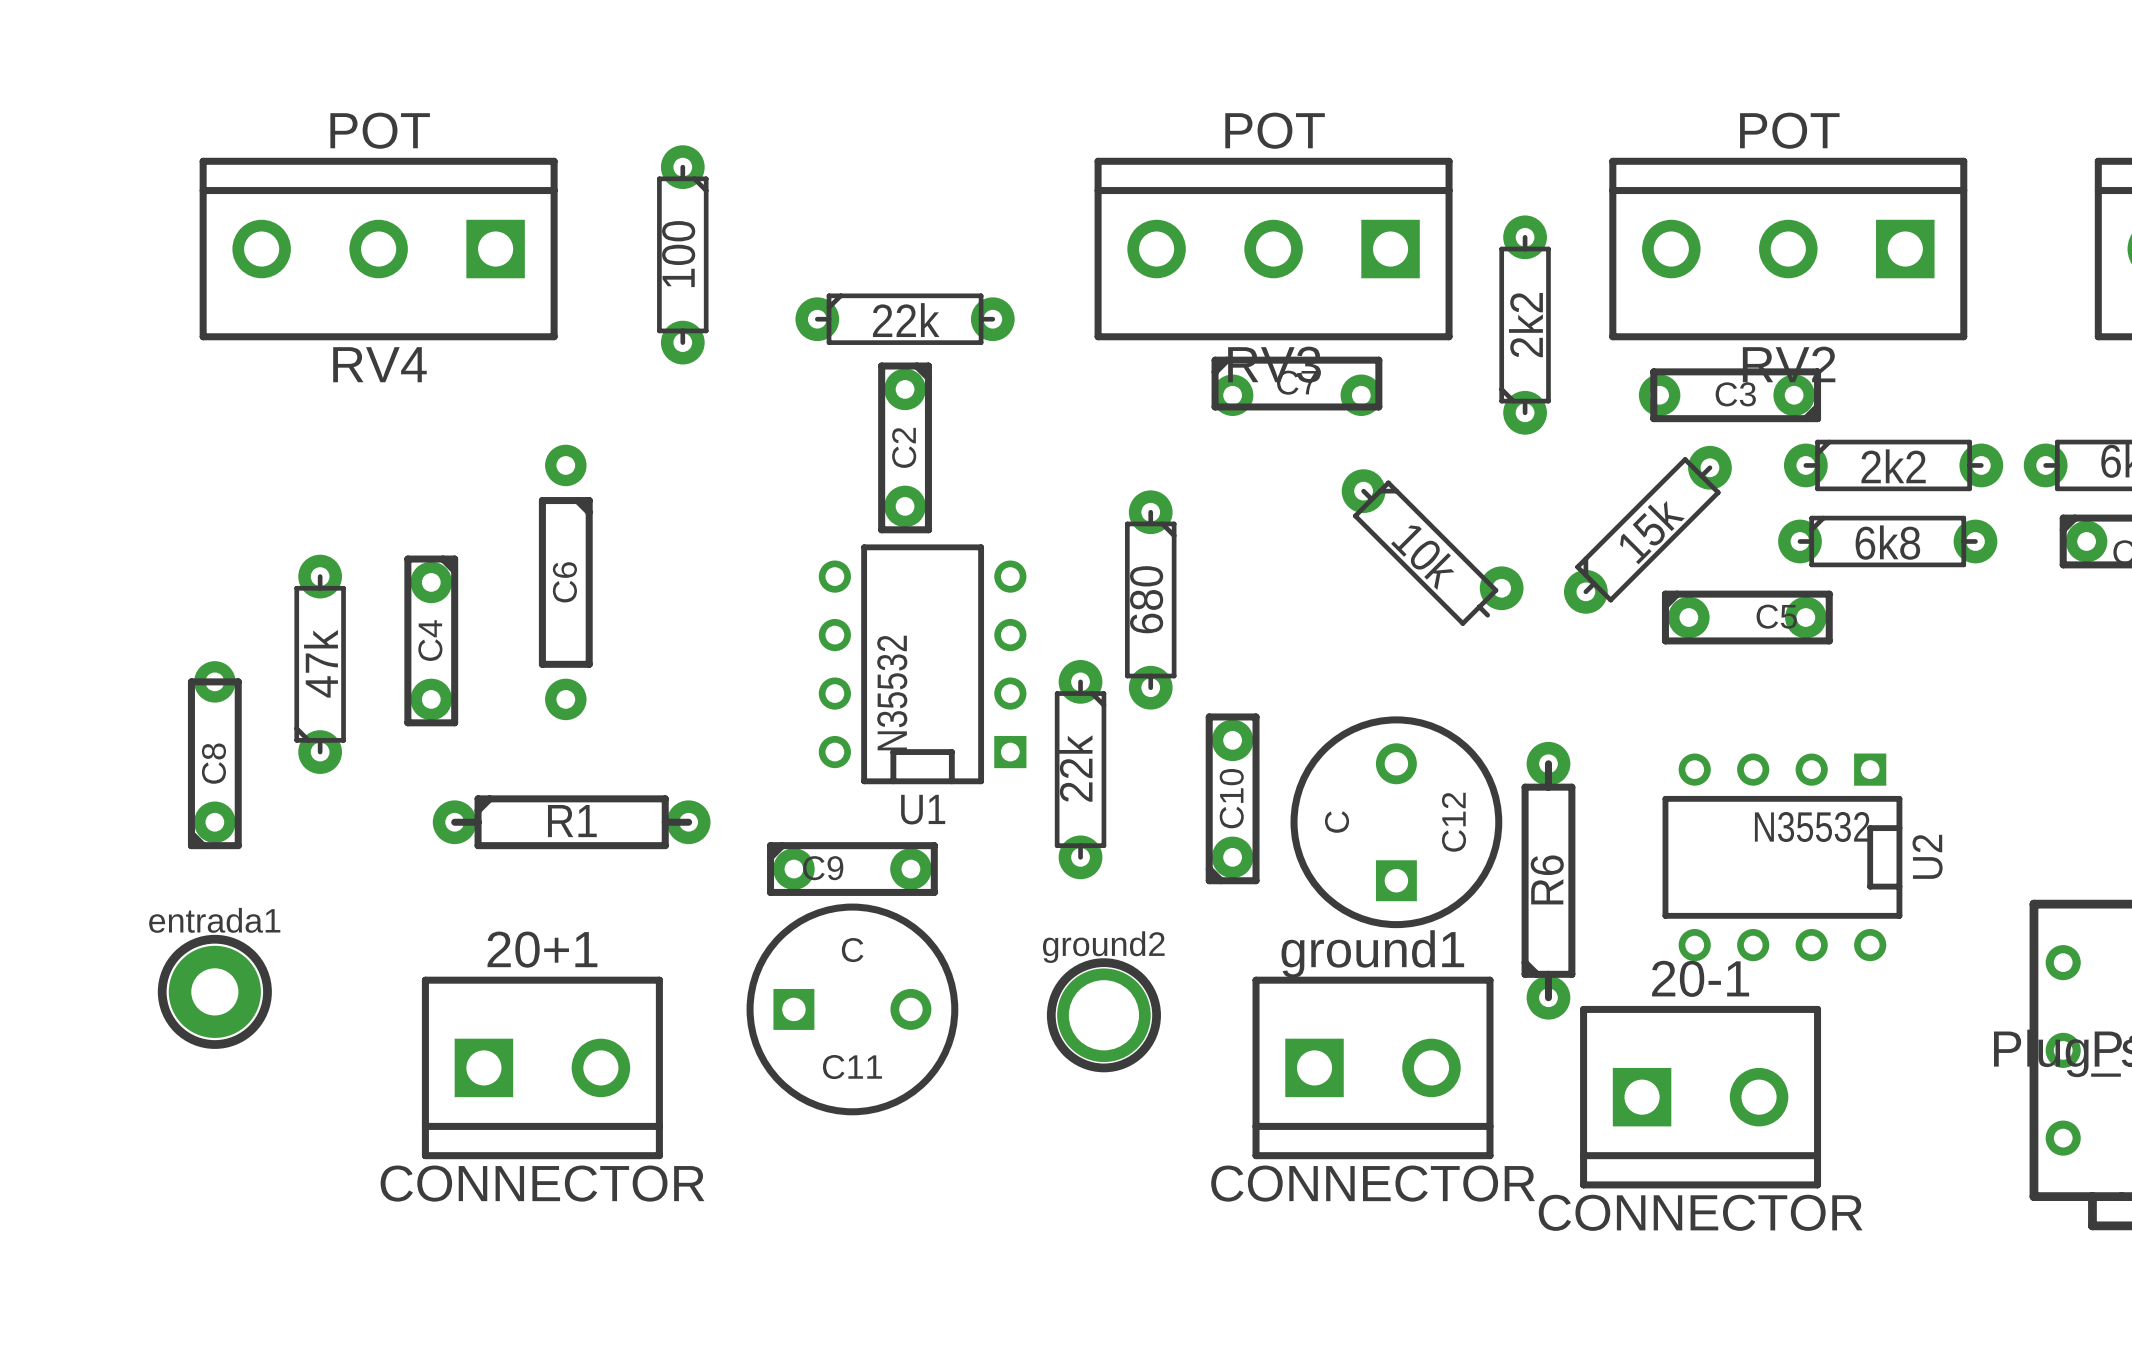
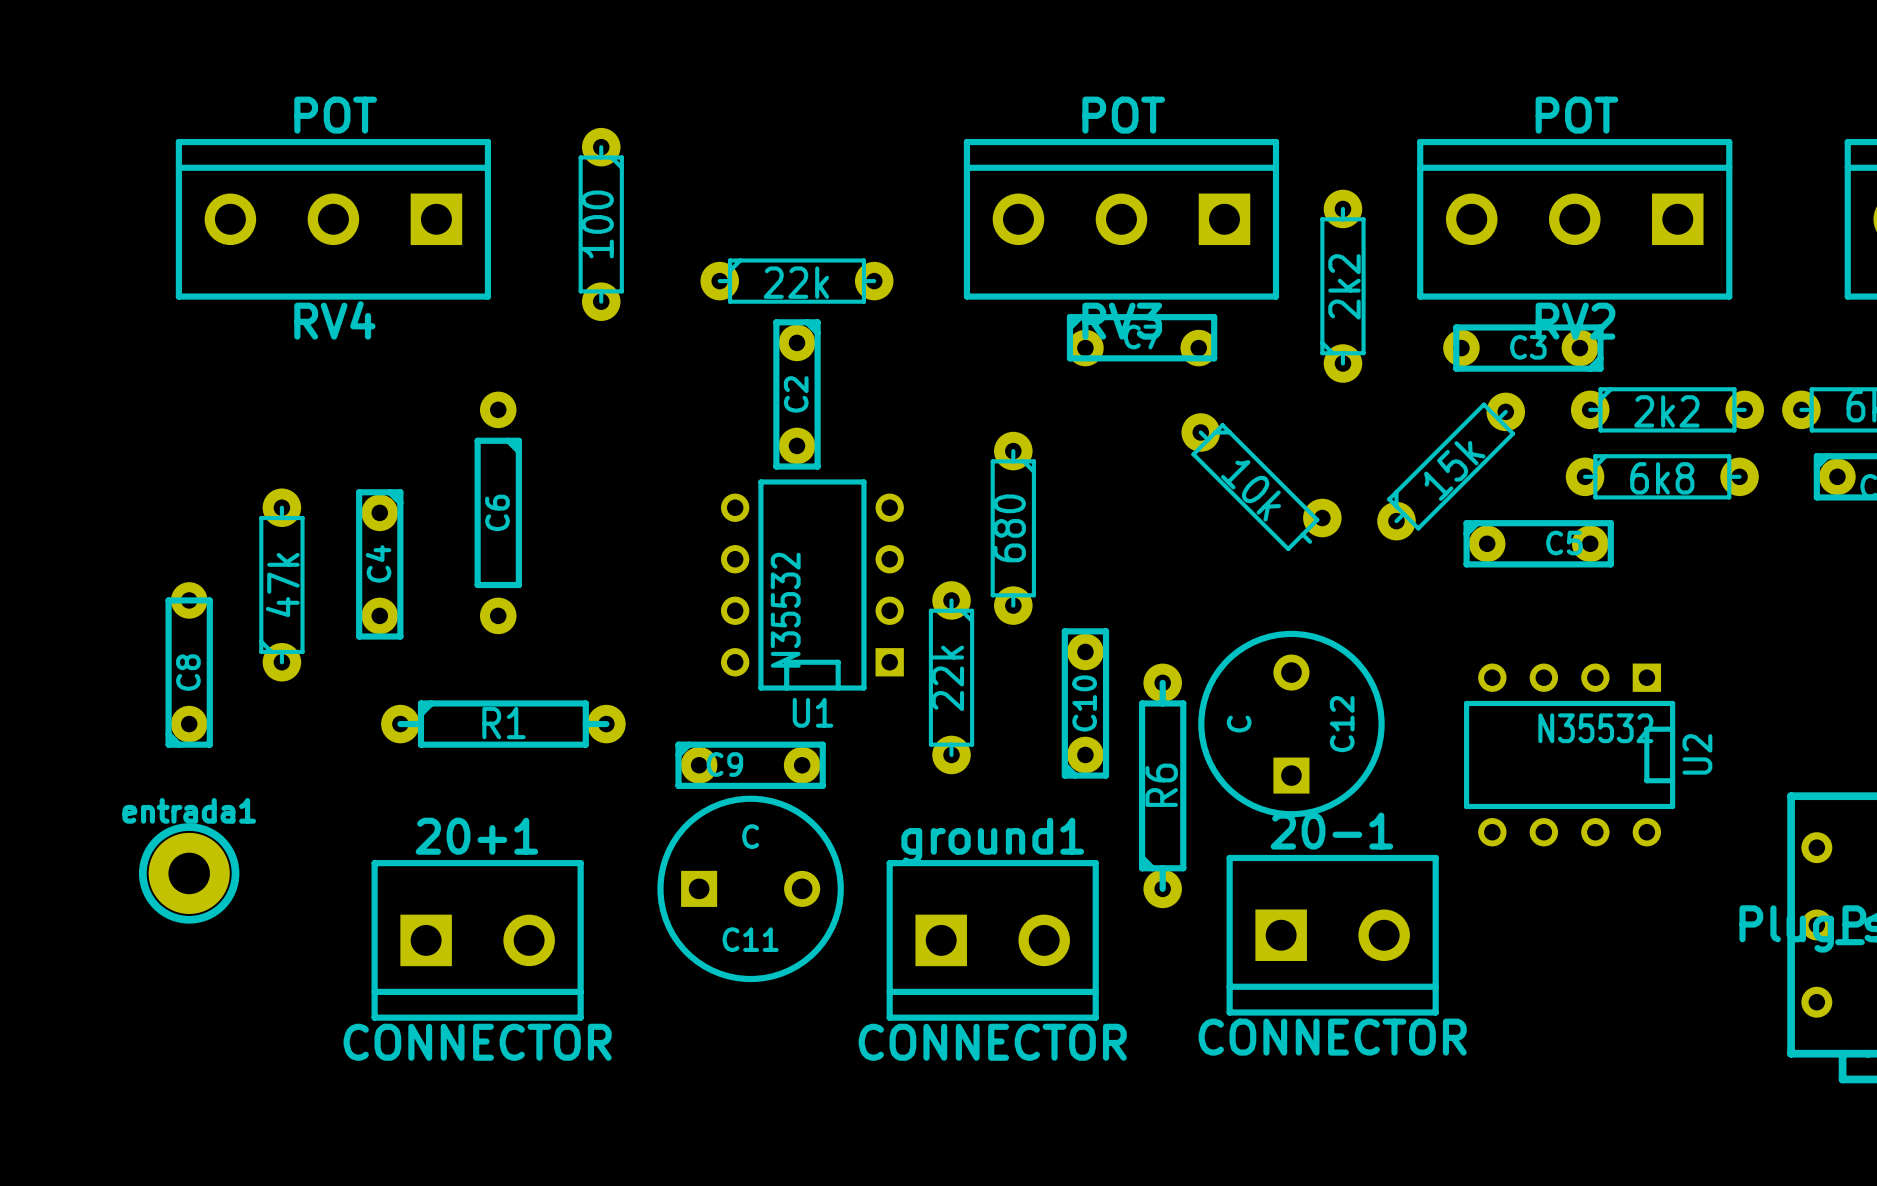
C12 position: (1396, 822) -> (1291, 724)
R6 position: (1548, 880) -> (1162, 785)
ground2: (1103, 1015) -> none
ground1 position: (1373, 1067) -> (992, 940)
20-1 position: (1700, 1097) -> (1332, 935)

